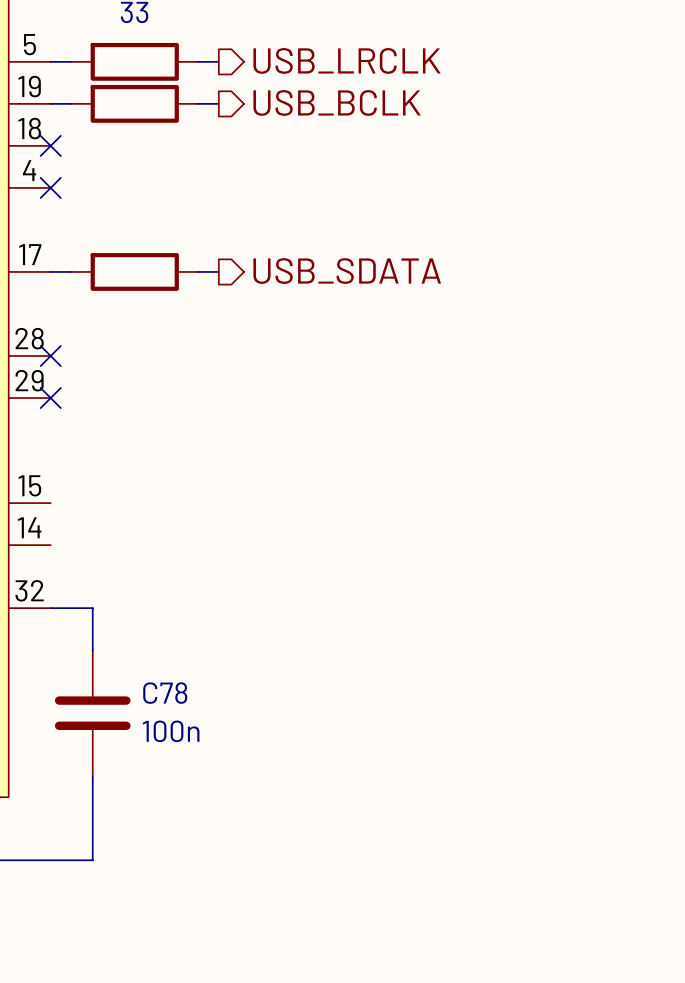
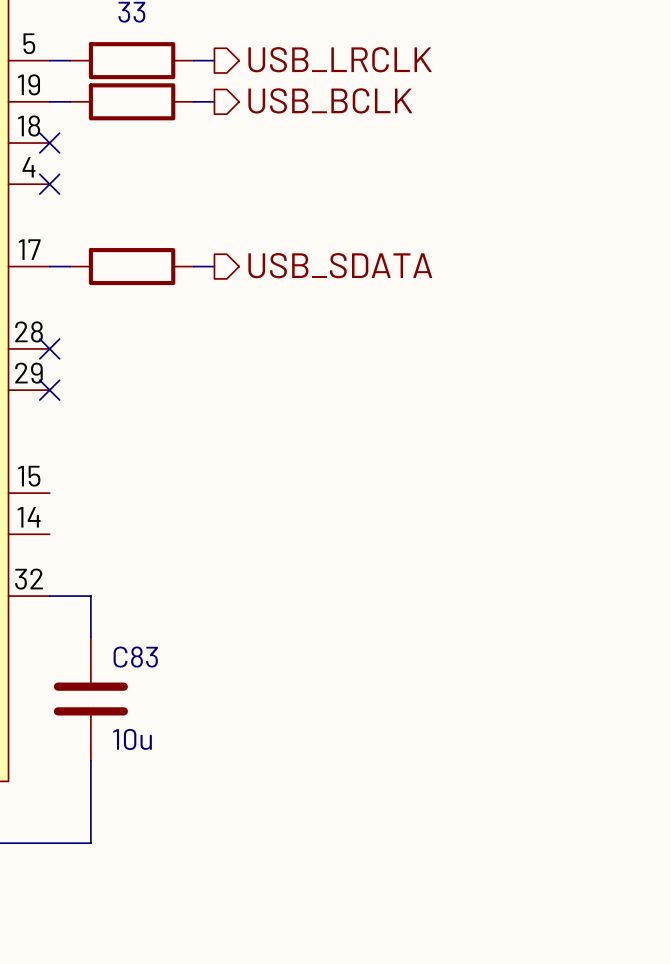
C78 name: C78 (165, 693) -> C83 (135, 657)
C78 value: 100n (171, 731) -> 10u (132, 739)

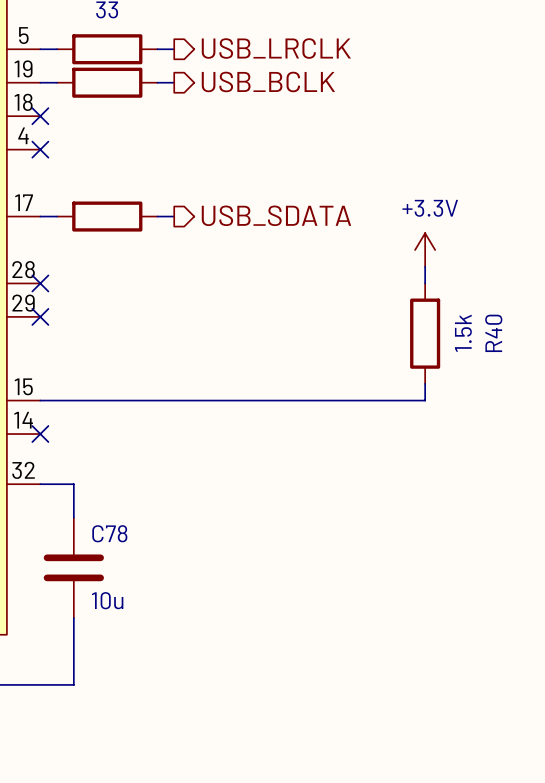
power symbol: none -> +3.3V (425, 250)
wire: none -> (425, 266) (425, 283)
R40: none -> 1.5k (425, 333)
wire: none -> (425, 383) (425, 400) (40, 400)
no-connect mark: none -> (40, 434)
C83 name: C83 (135, 657) -> C78 (109, 533)

